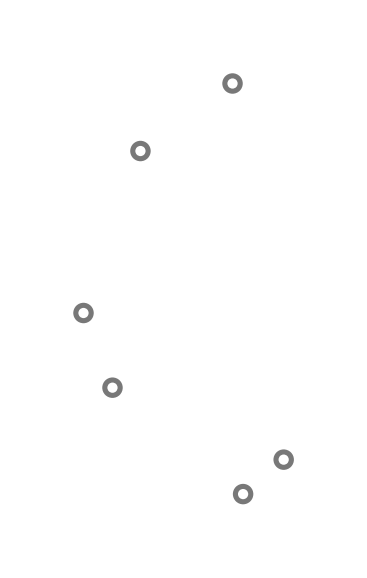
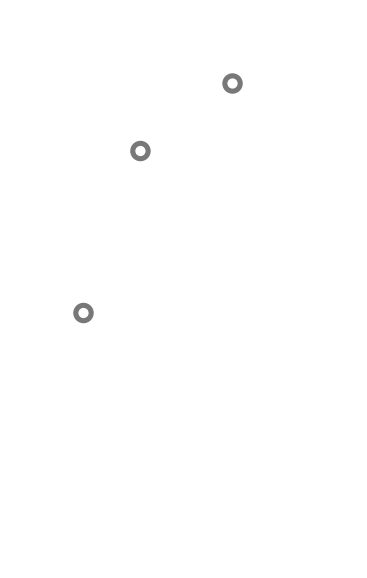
via: (112, 387) -> none
via: (283, 459) -> none
via: (243, 494) -> none

